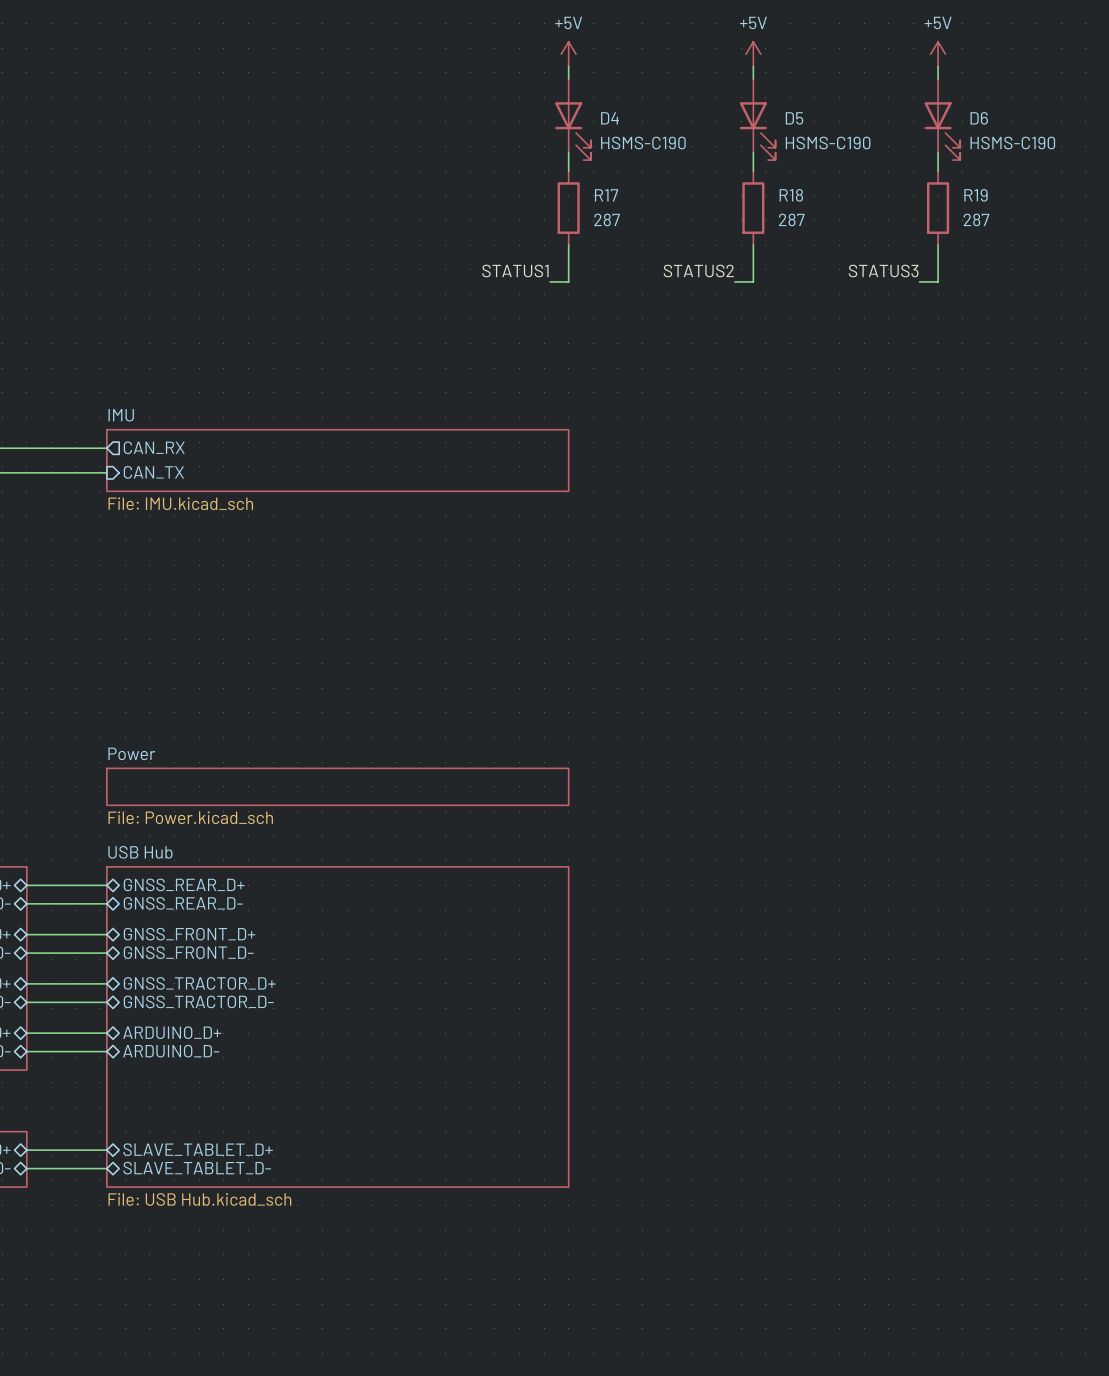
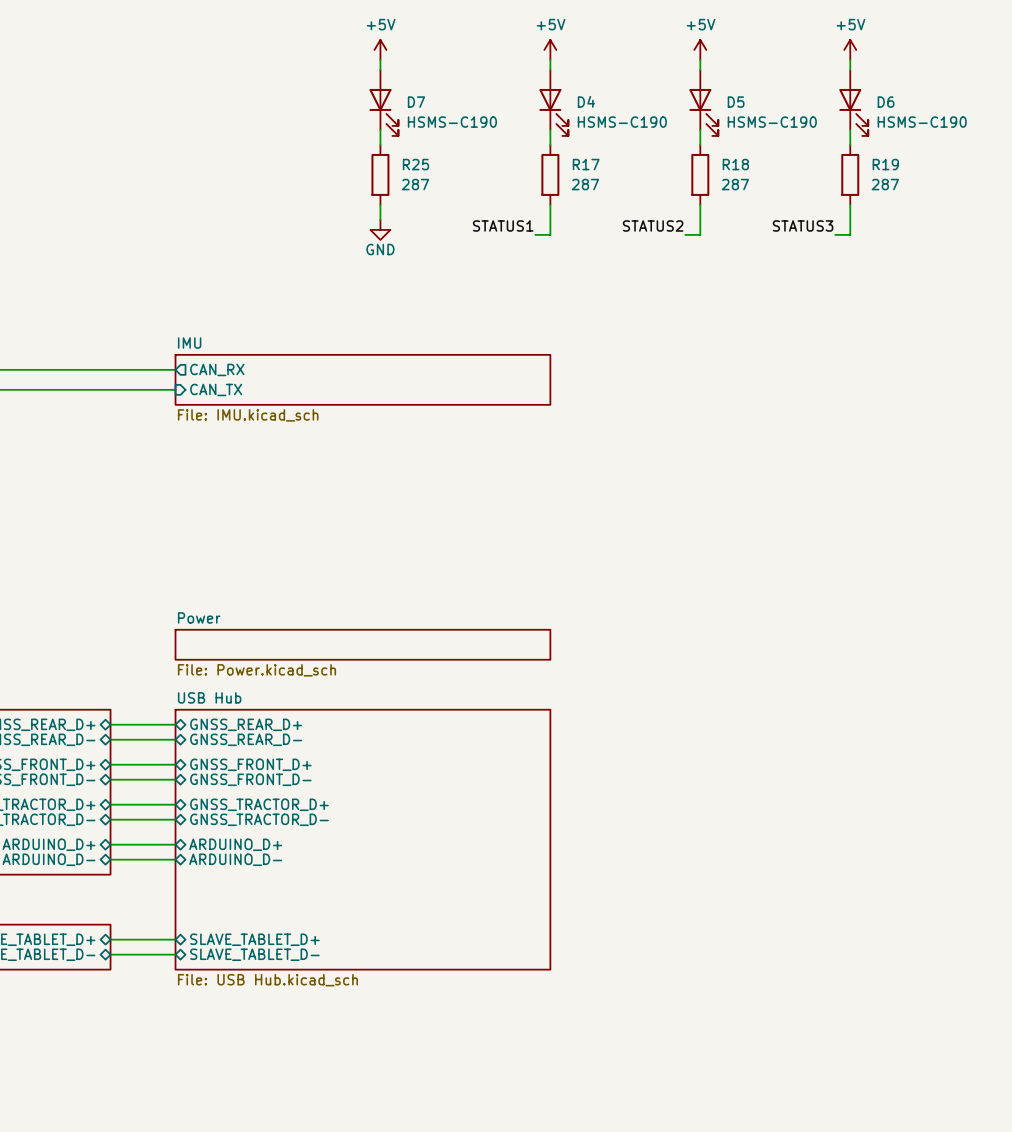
power symbol: none -> +5V (380, 49)
wire: none -> (380, 59) (380, 69)
D7: none -> HSMS-C190 (383, 102)
wire: none -> (380, 129) (380, 144)
R25: none -> 287 (380, 174)
wire: none -> (380, 204) (380, 219)
power symbol: none -> GND (380, 229)

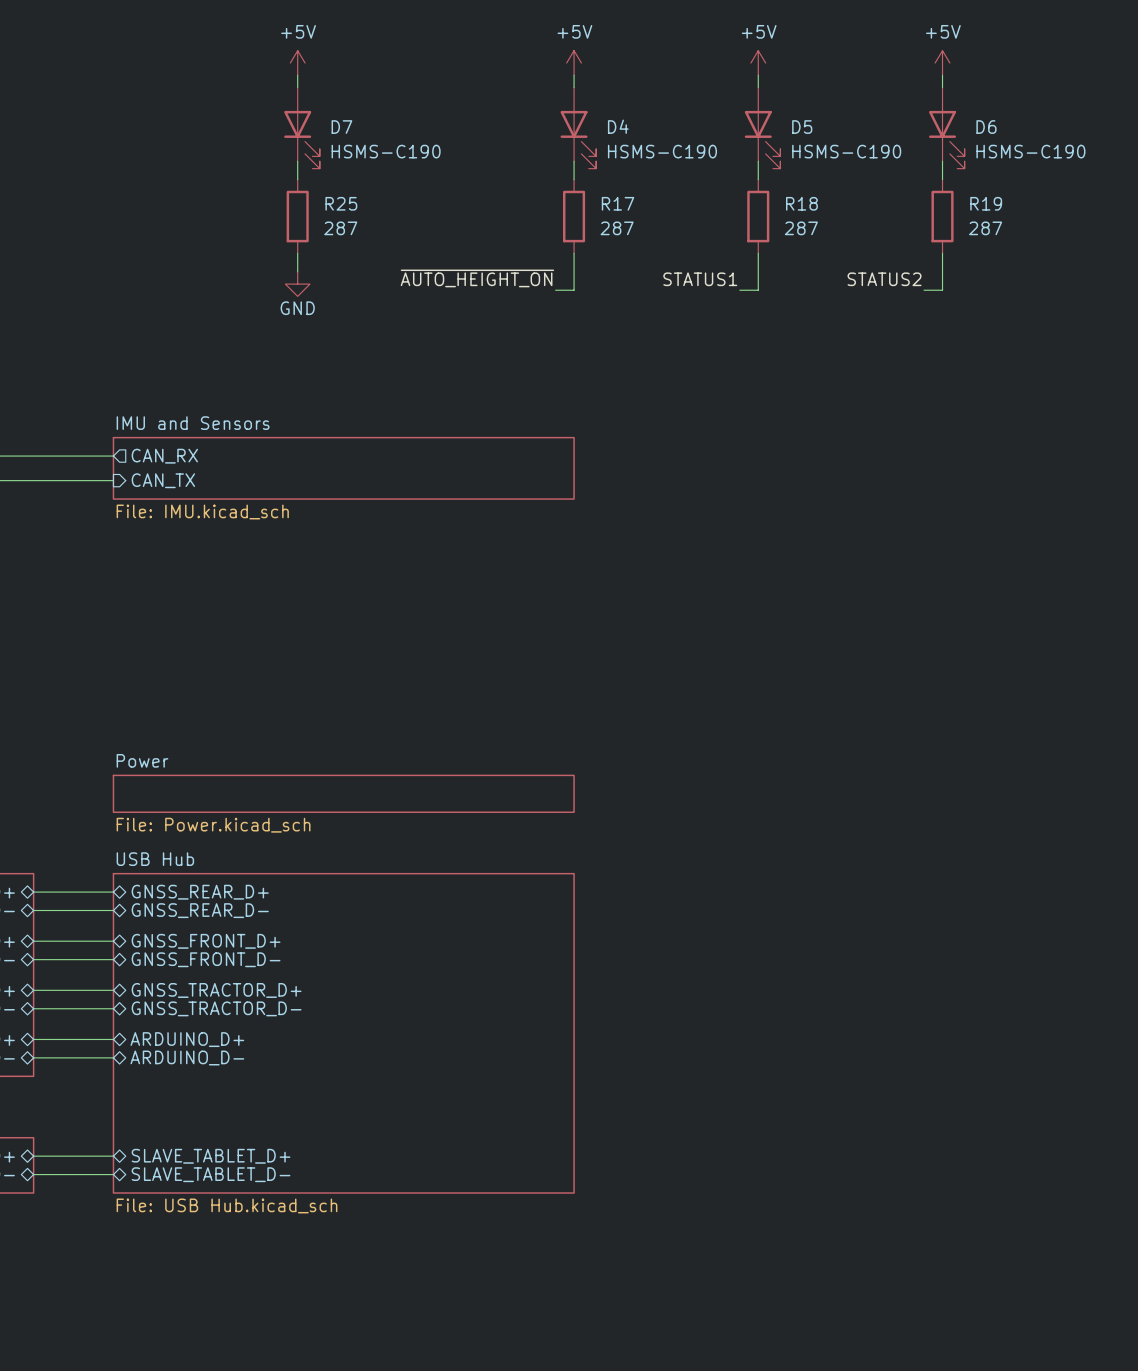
power symbol position: +5V (380, 49) -> +5V (297, 63)
wire: (380, 59) (380, 69) -> (297, 75) (297, 87)
D7 position: (383, 102) -> (301, 128)
wire: (380, 129) (380, 144) -> (297, 161) (297, 179)
R25 position: (380, 174) -> (297, 216)
wire: (380, 204) (380, 219) -> (297, 253) (297, 271)
label: STATUS1 (503, 225) -> ~{AUTO_HEIGHT_ON} (477, 278)
label: STATUS2 (653, 225) -> STATUS1 (700, 279)
label: STATUS3 (803, 225) -> STATUS2 (884, 279)
power symbol position: GND (380, 229) -> GND (297, 284)
sheet IMU name: IMU (189, 343) -> IMU and Sensors (193, 423)

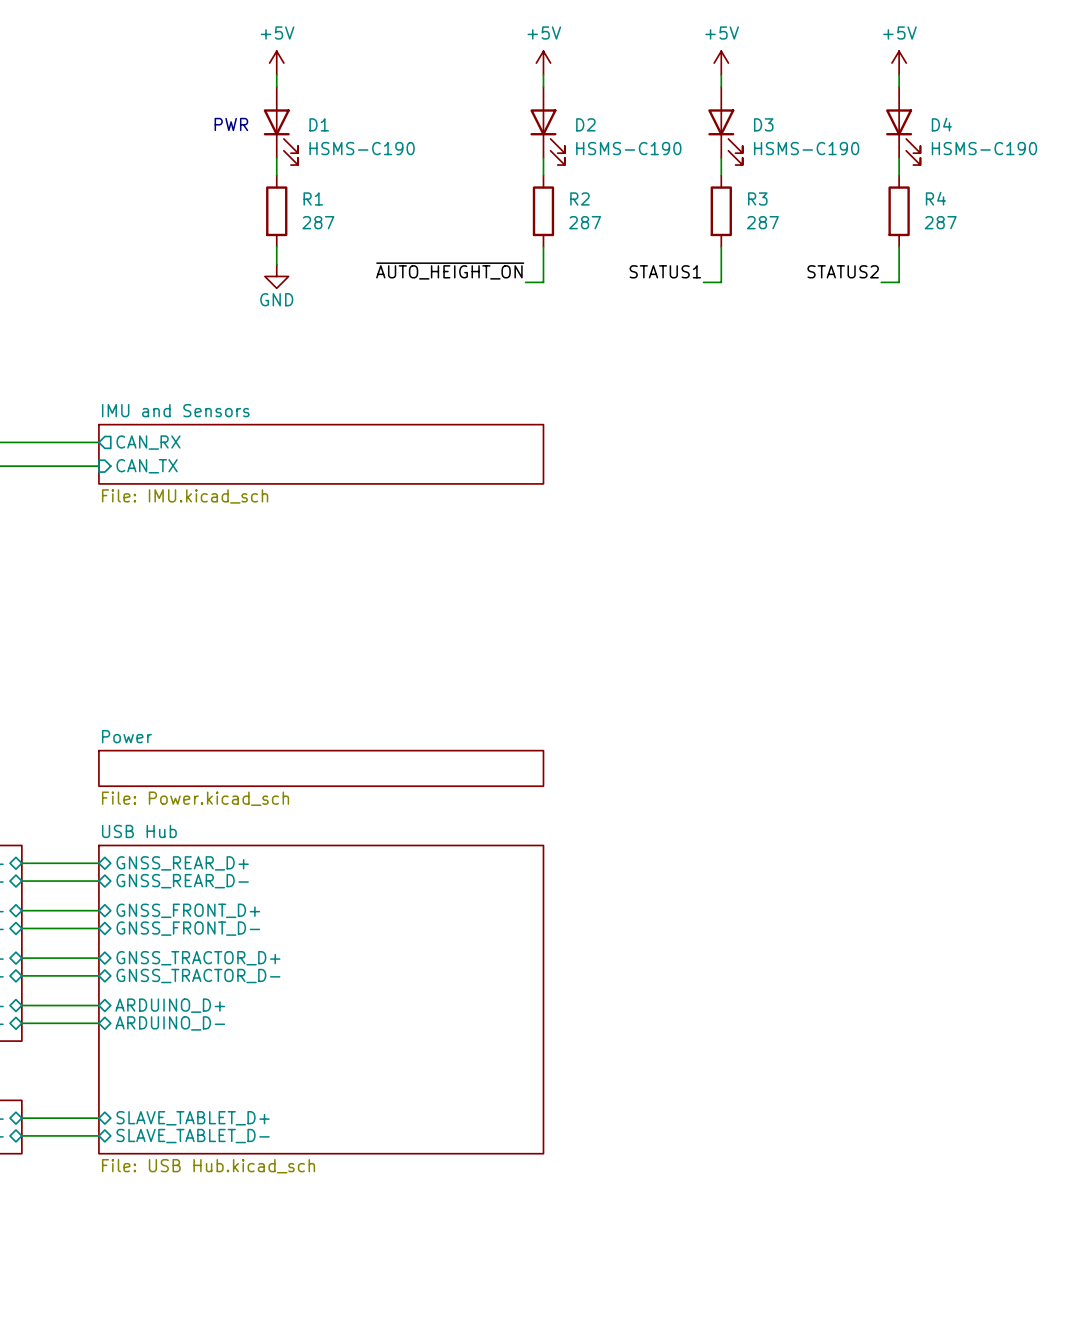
text: none -> PWR (231, 124)
D4 name: D4 (618, 126) -> D2 (585, 124)
D7 name: D7 (341, 127) -> D1 (319, 124)
D5 name: D5 (802, 127) -> D3 (763, 124)
D6 name: D6 (986, 127) -> D4 (941, 124)
R25 name: R25 (341, 203) -> R1 (313, 198)
R17 name: R17 (618, 203) -> R2 (579, 198)
R18 name: R18 (801, 203) -> R3 (757, 198)
R19 name: R19 (986, 203) -> R4 (935, 198)

